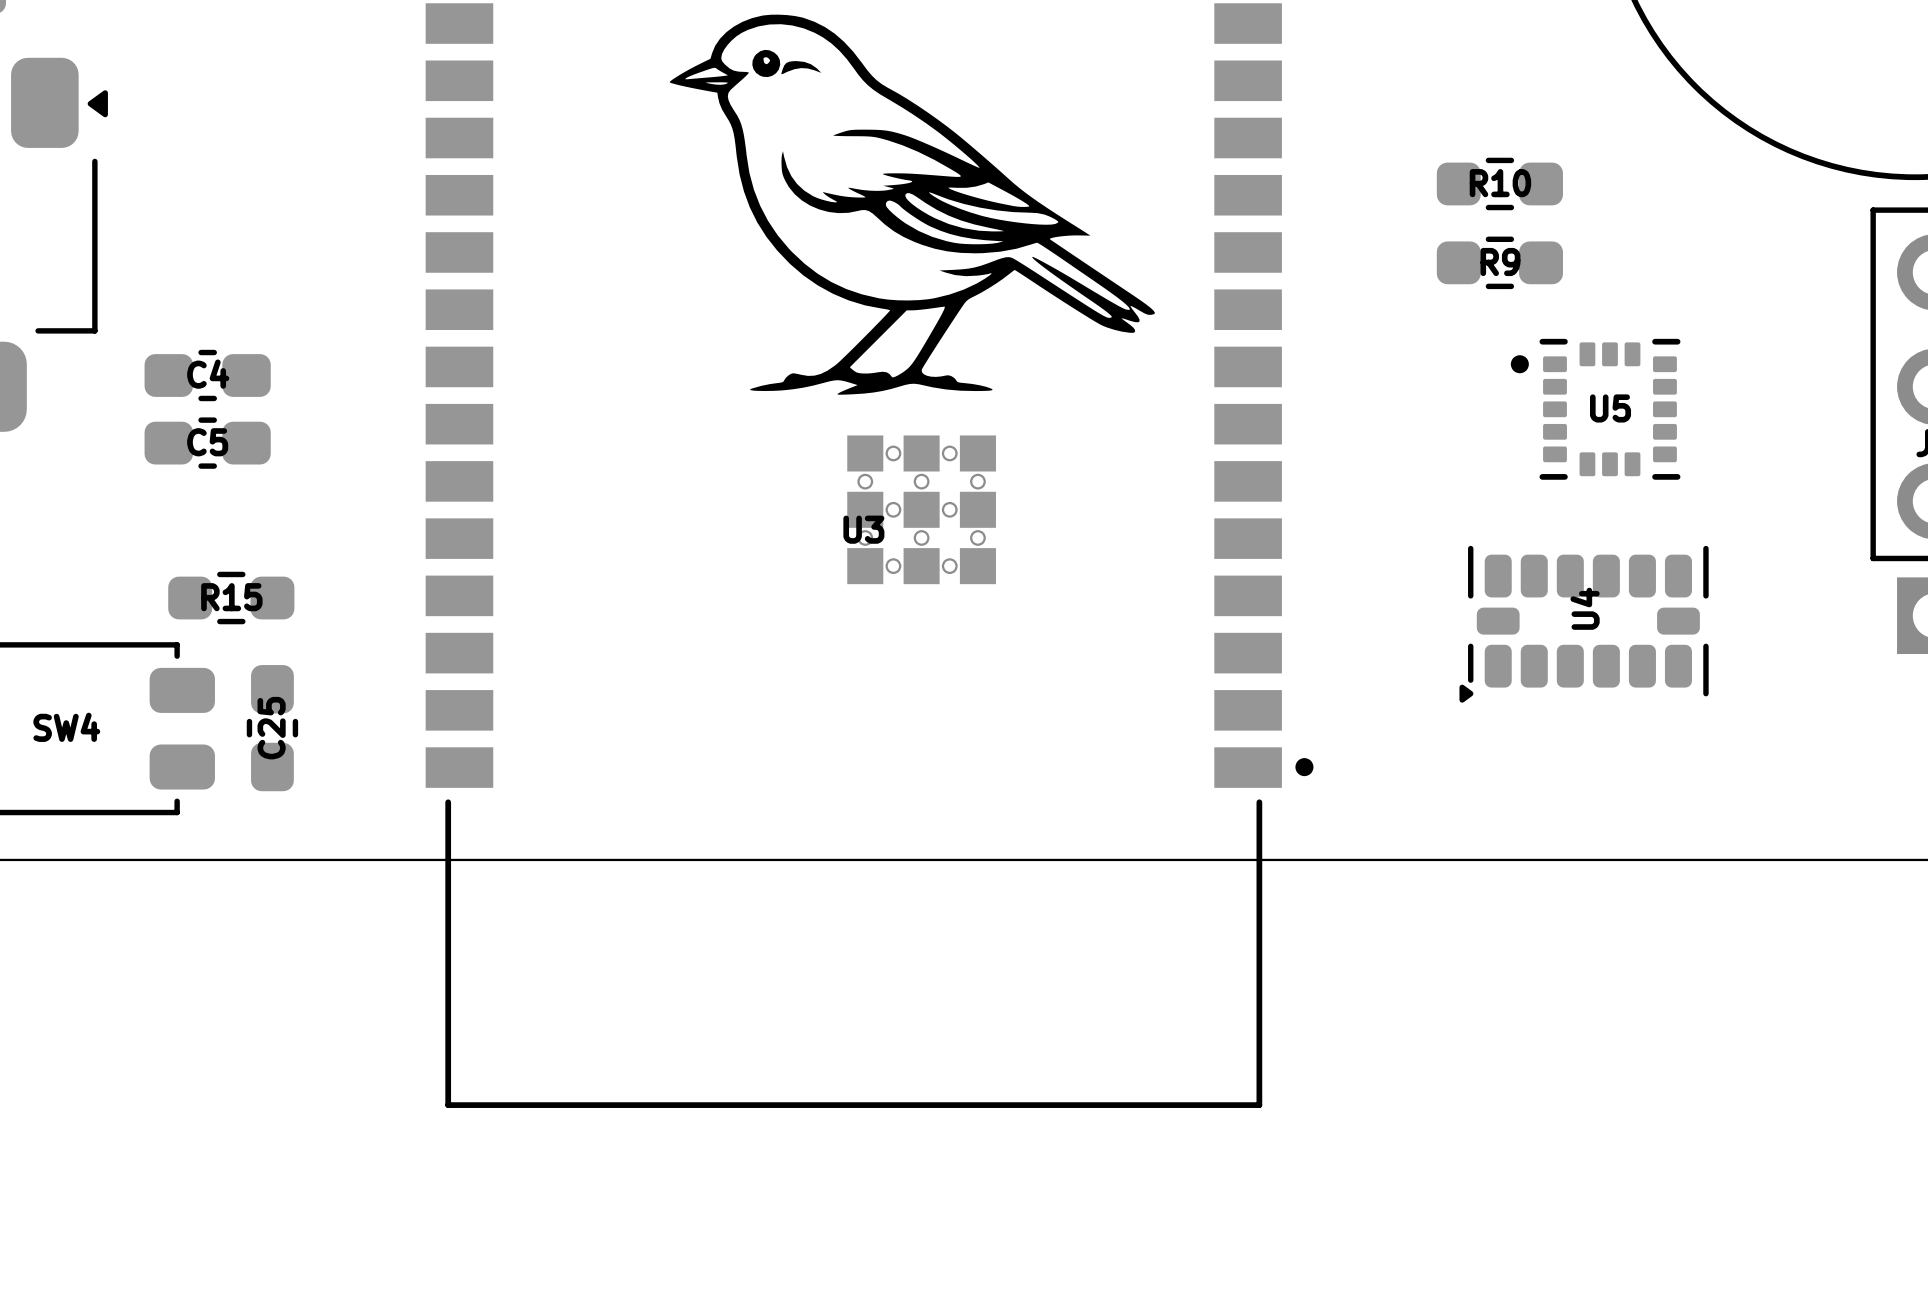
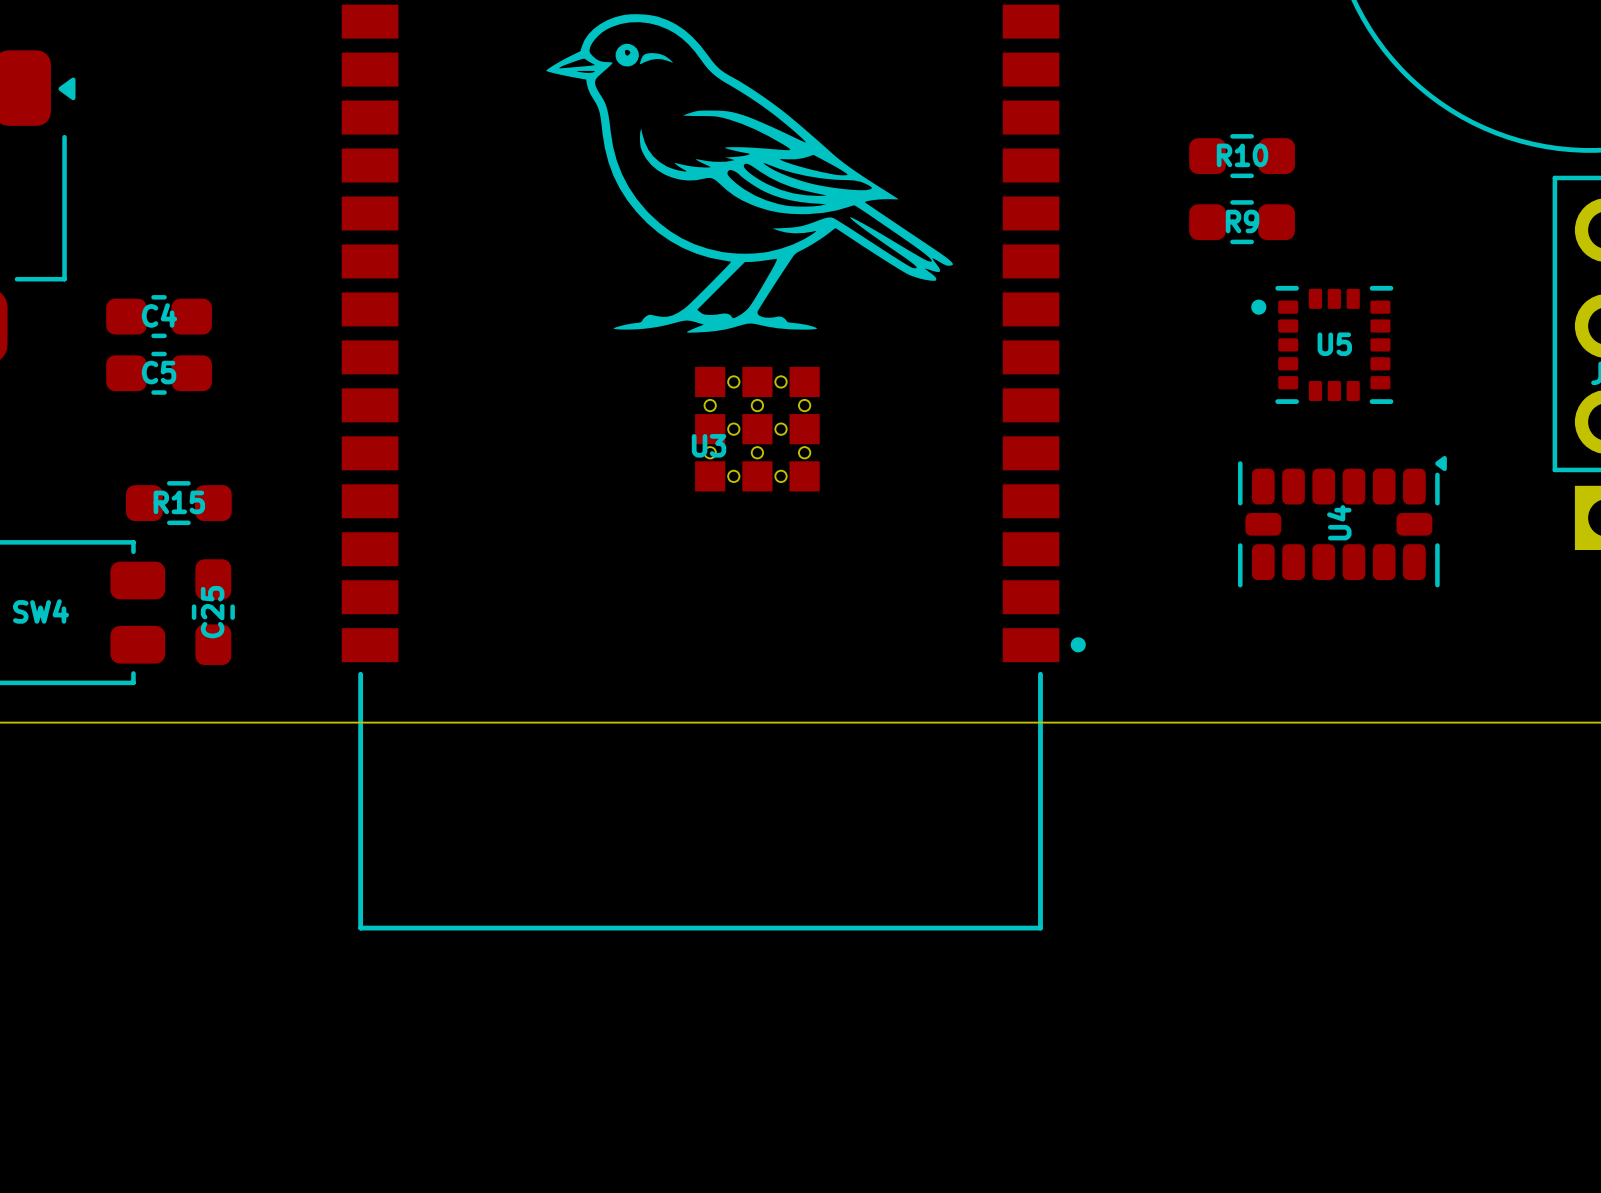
U4 rotation: 0° (1584, 624) -> 180° (1342, 521)

